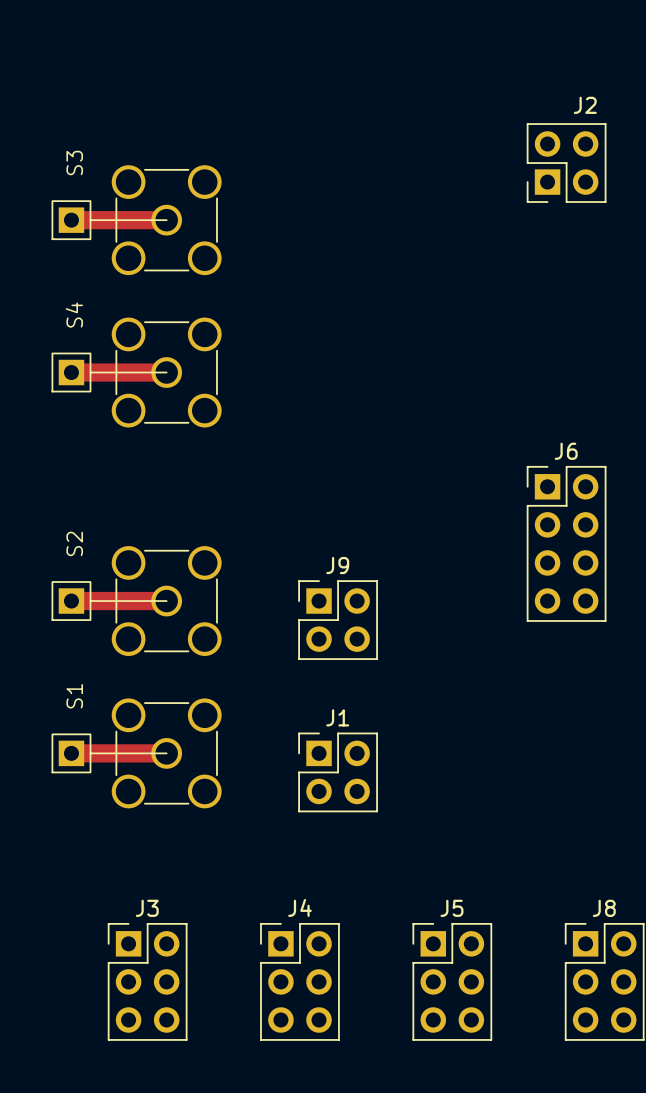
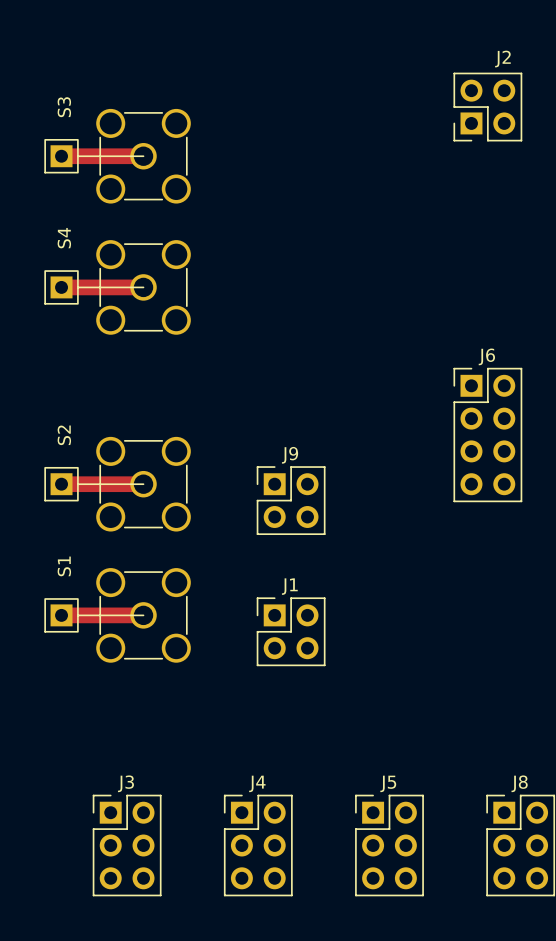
J2 position: (566, 163) -> (487, 107)
S3 position: (136, 220) -> (117, 156)
S4 position: (136, 372) -> (117, 287)
J6 position: (566, 543) -> (487, 435)
S2 position: (136, 601) -> (117, 484)
J9 position: (338, 620) -> (291, 500)
S1 position: (136, 753) -> (117, 615)
J1 position: (338, 772) -> (291, 631)

